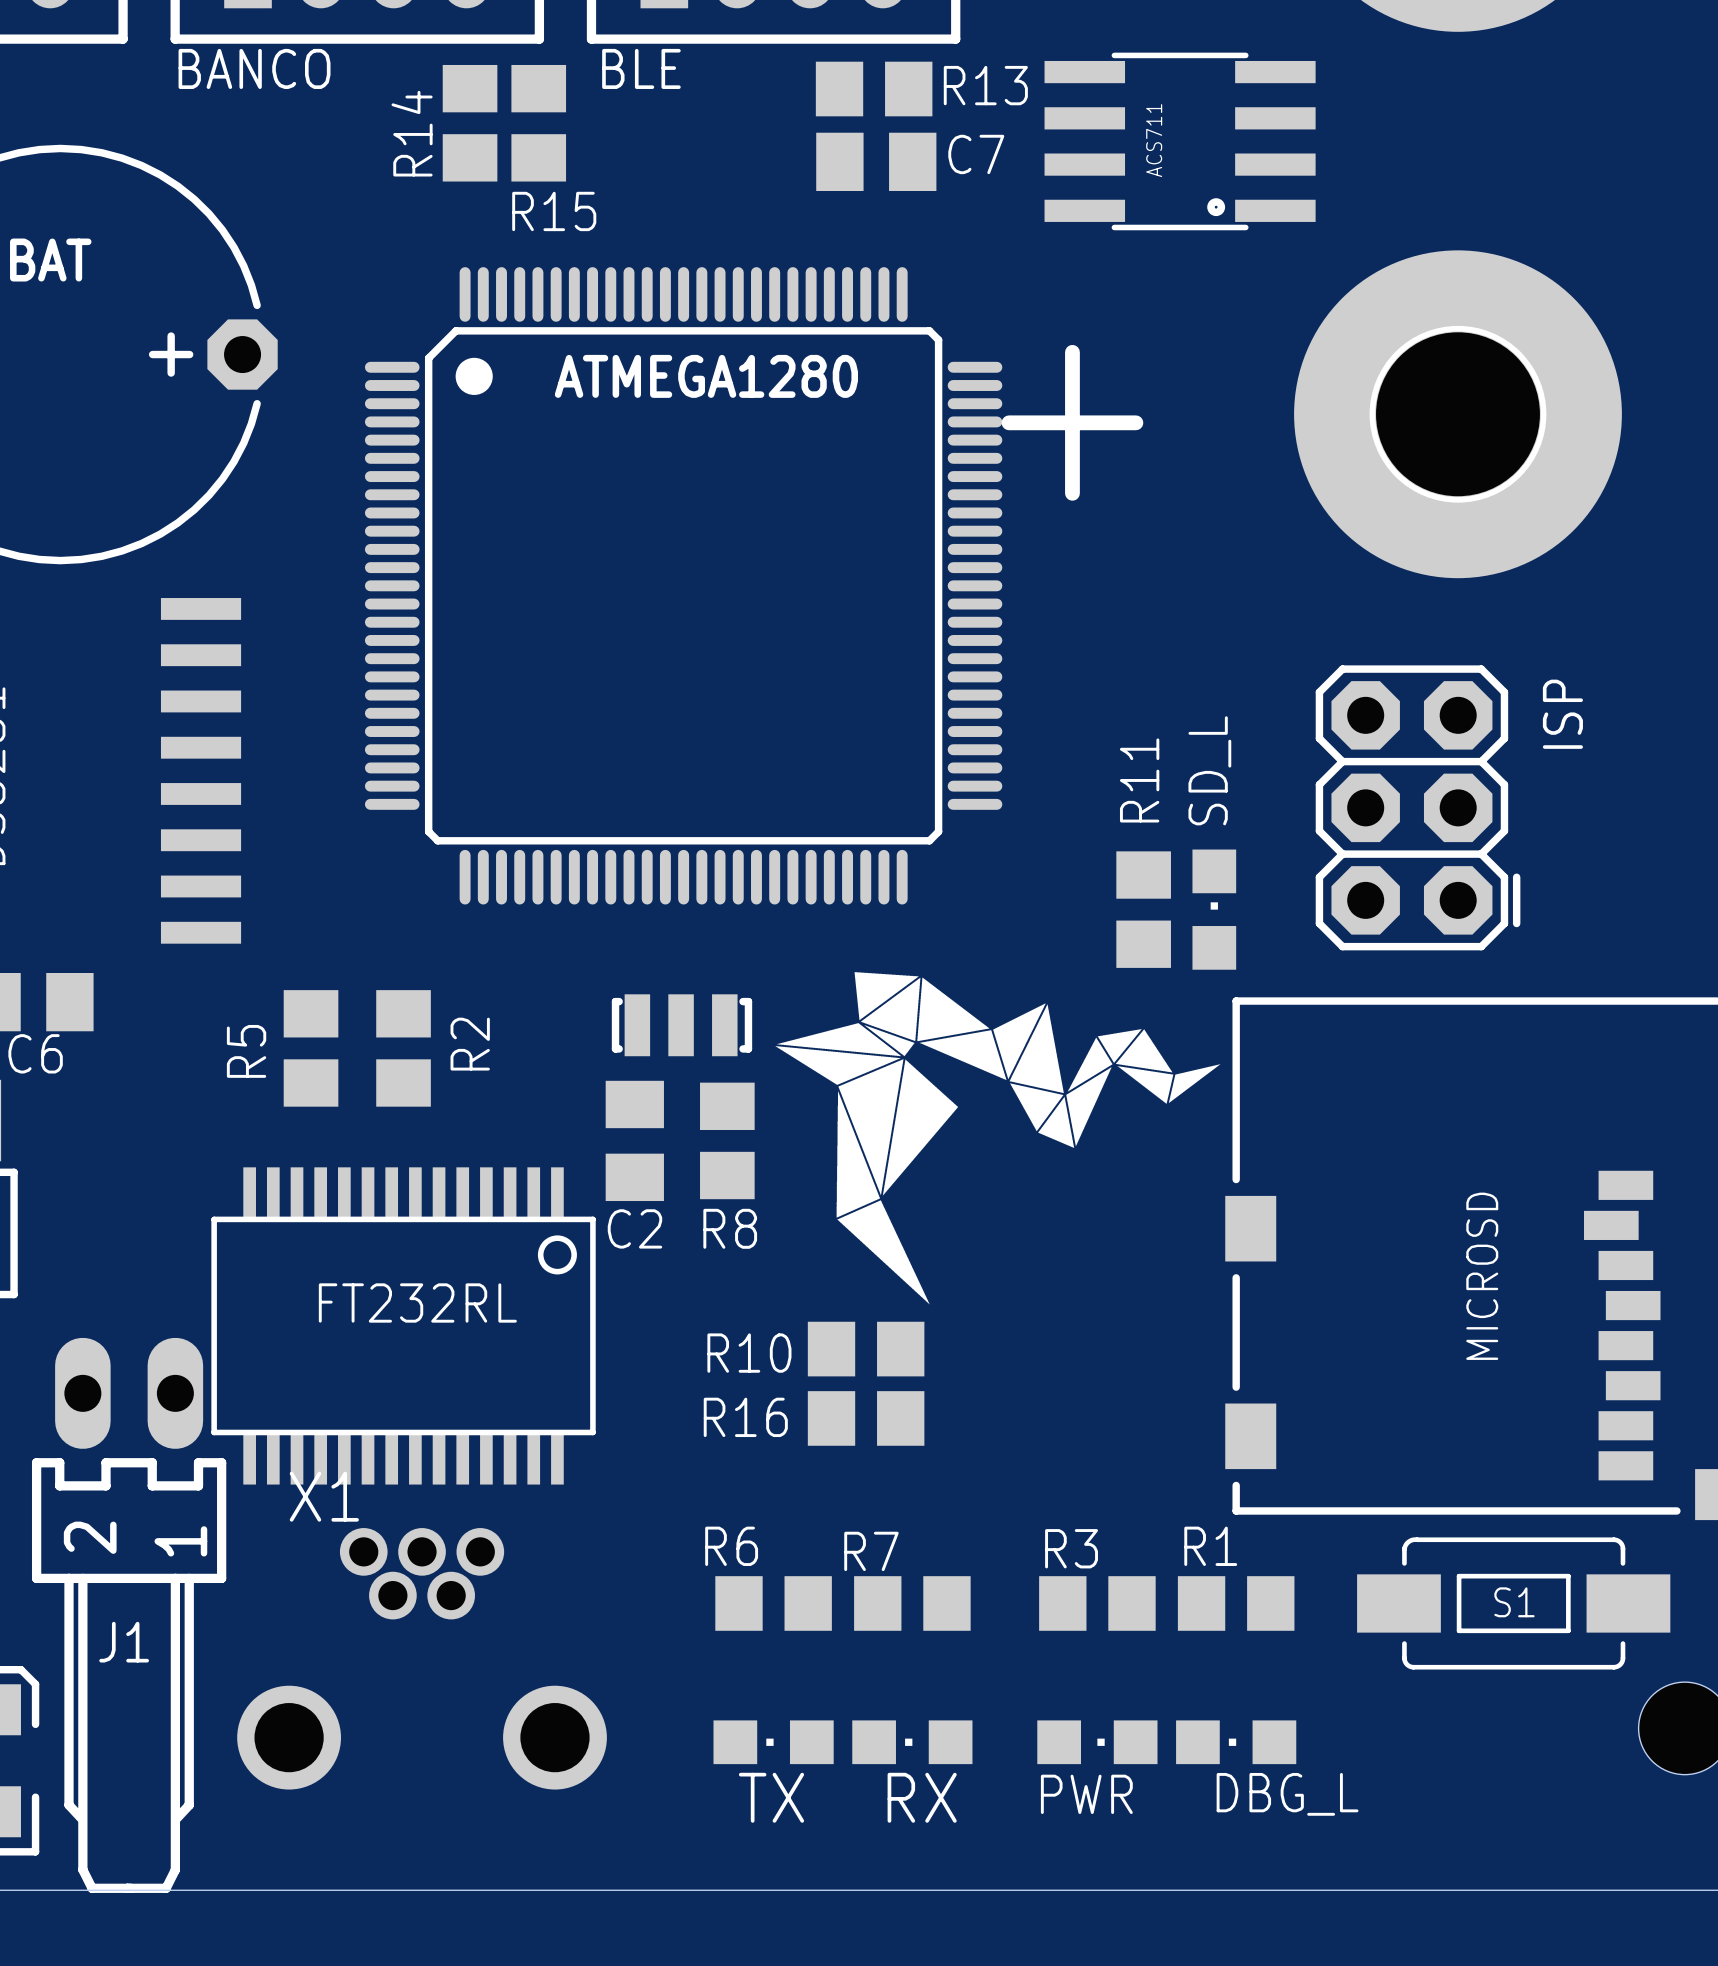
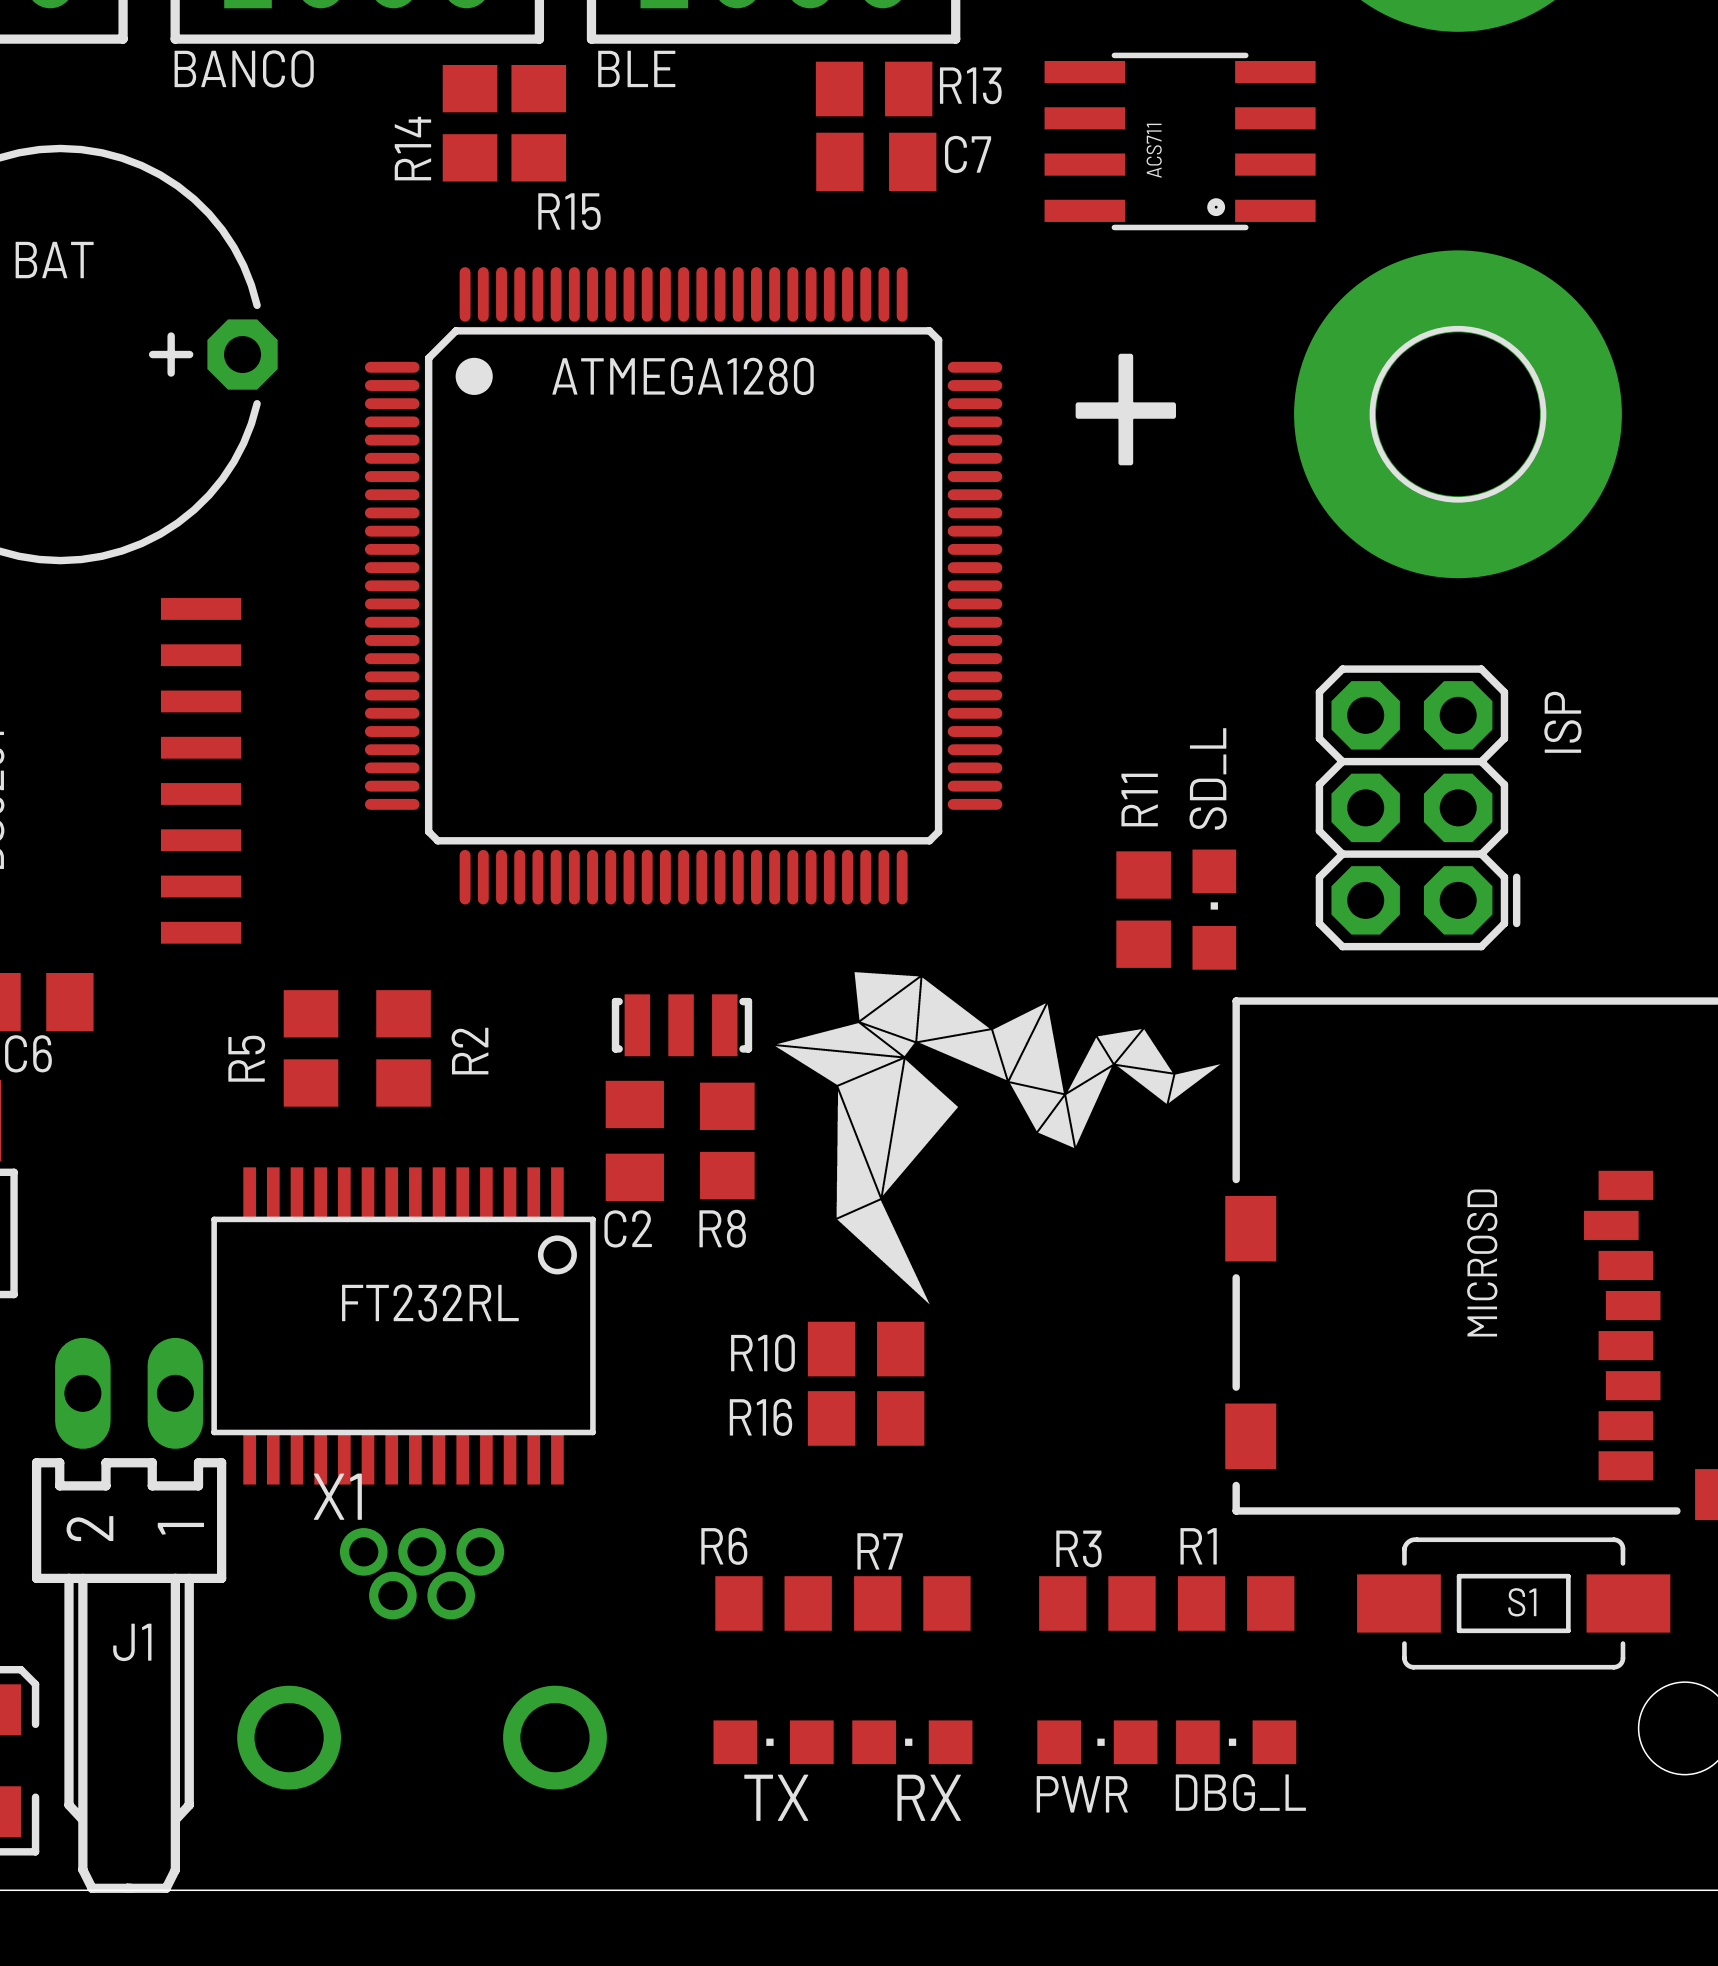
DBG_L name position: DBG_L (1287, 1794) -> DBG_L (1240, 1792)

